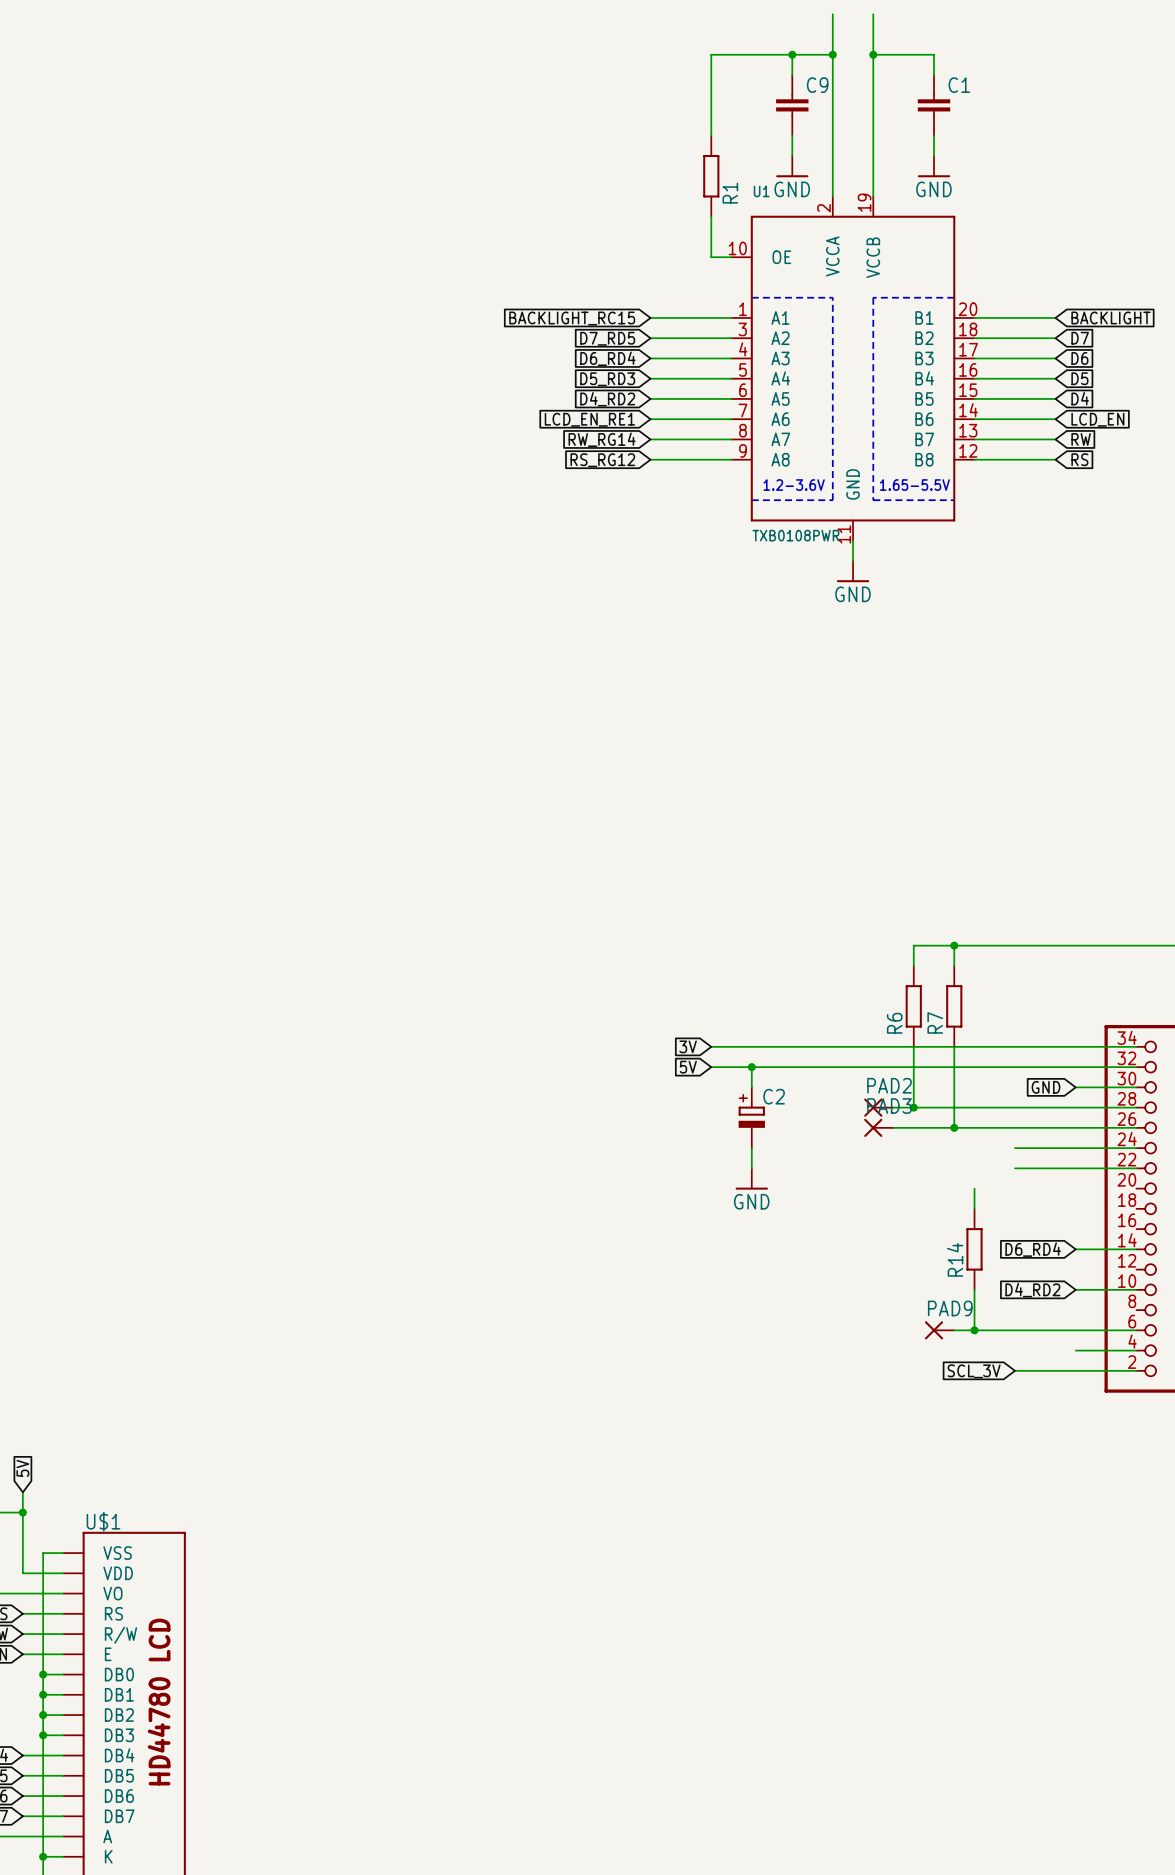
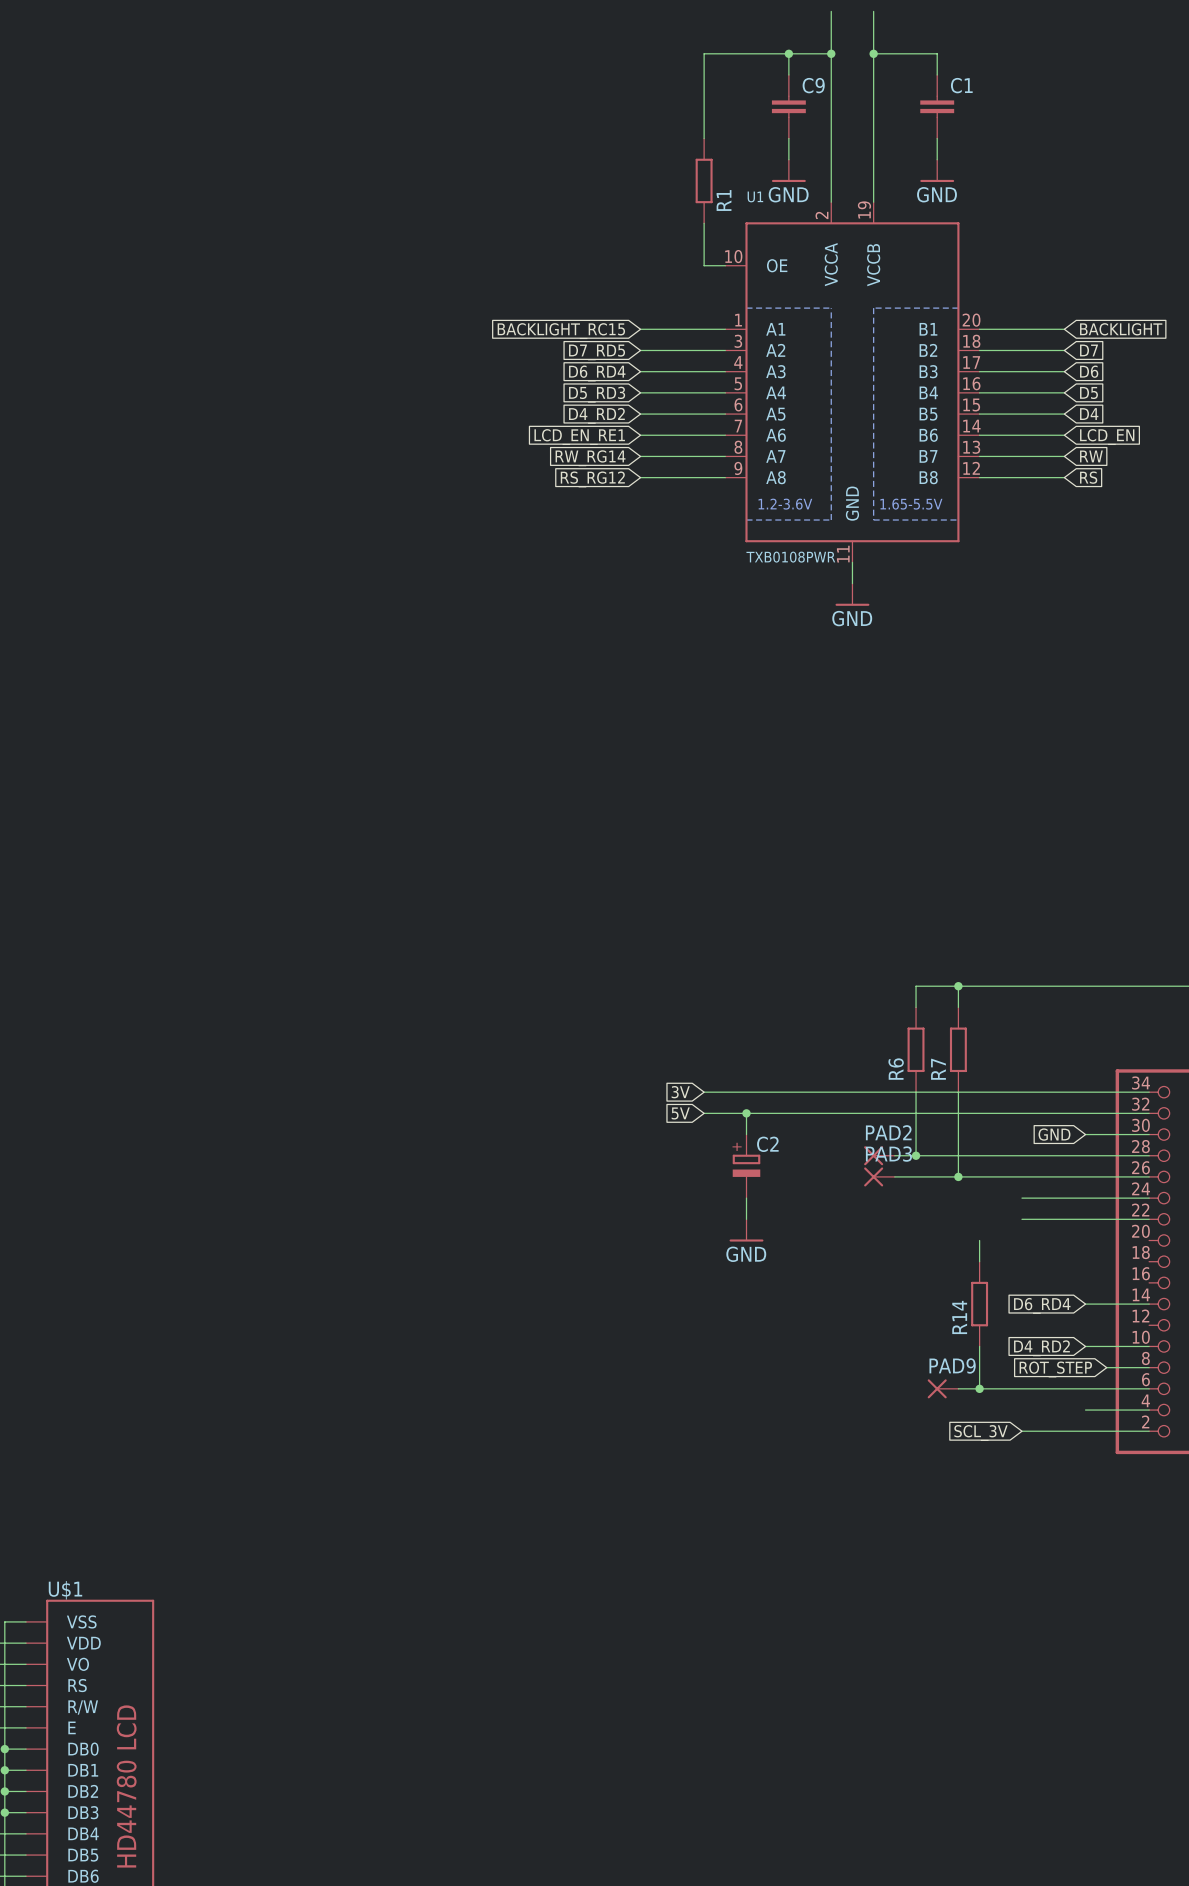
global label: none -> ROT_STEP (1055, 1369)
wire: none -> (1106, 1367) (1149, 1367)

